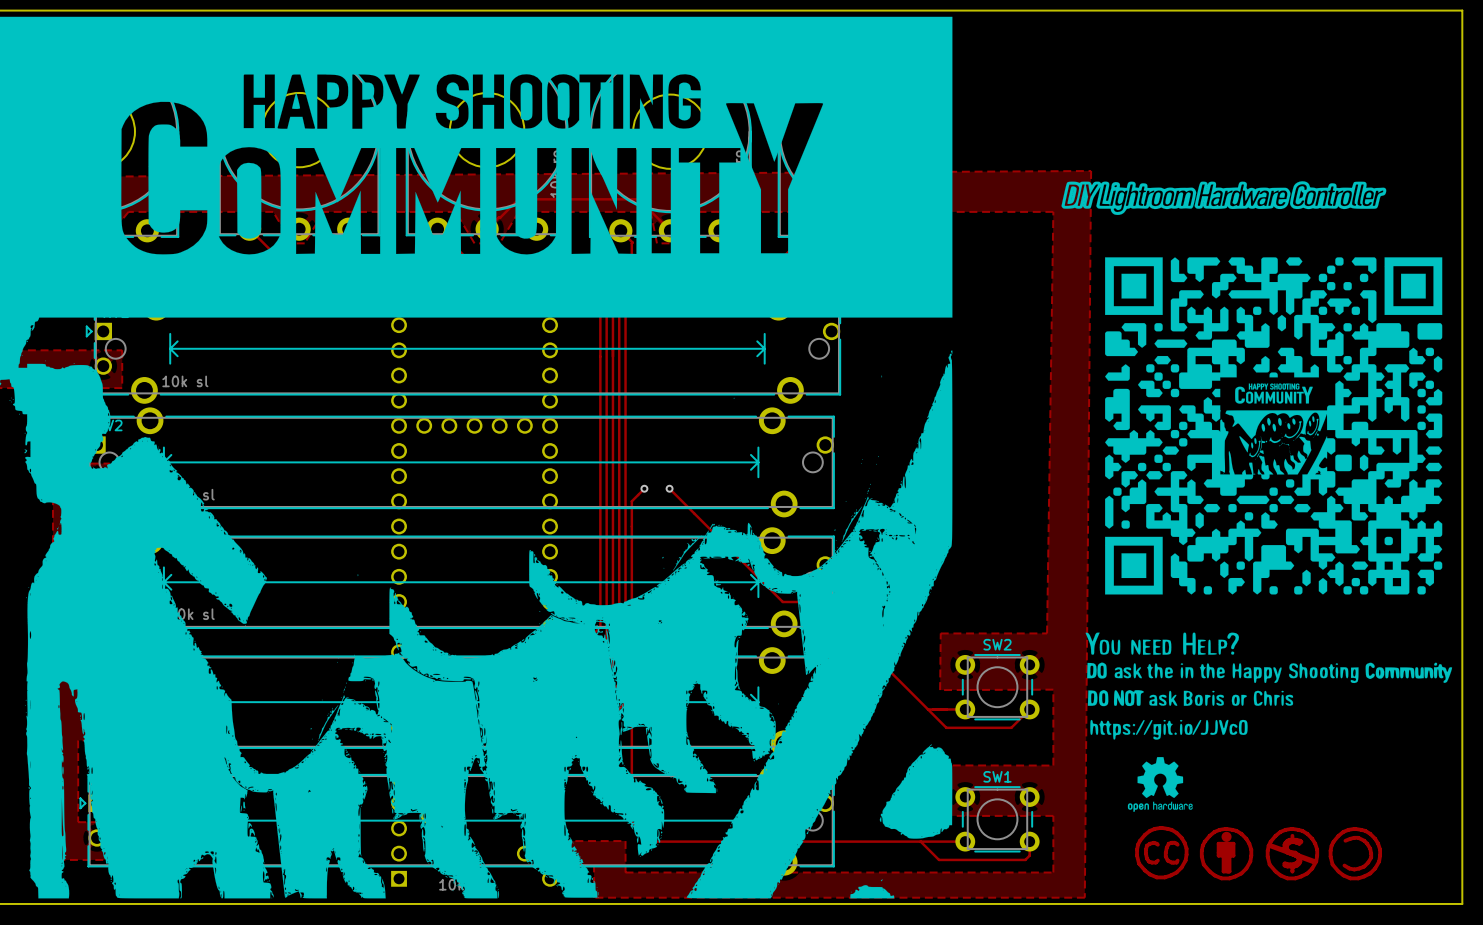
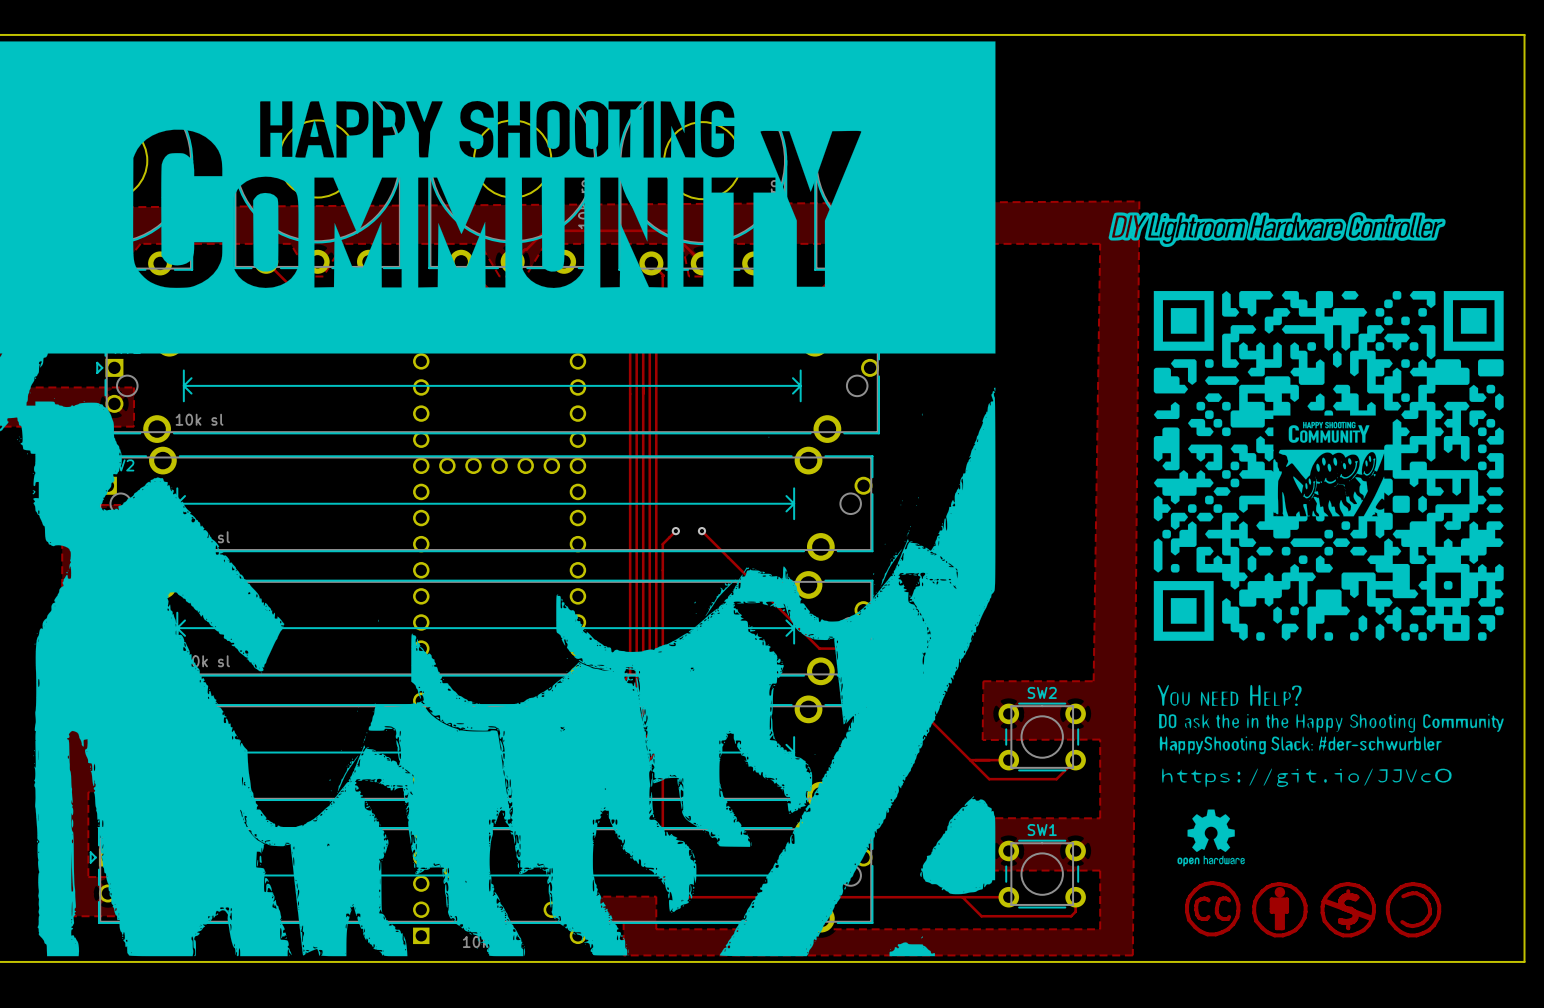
drawing shape: [1085, 632, 1453, 740] -> [1157, 684, 1504, 788]

